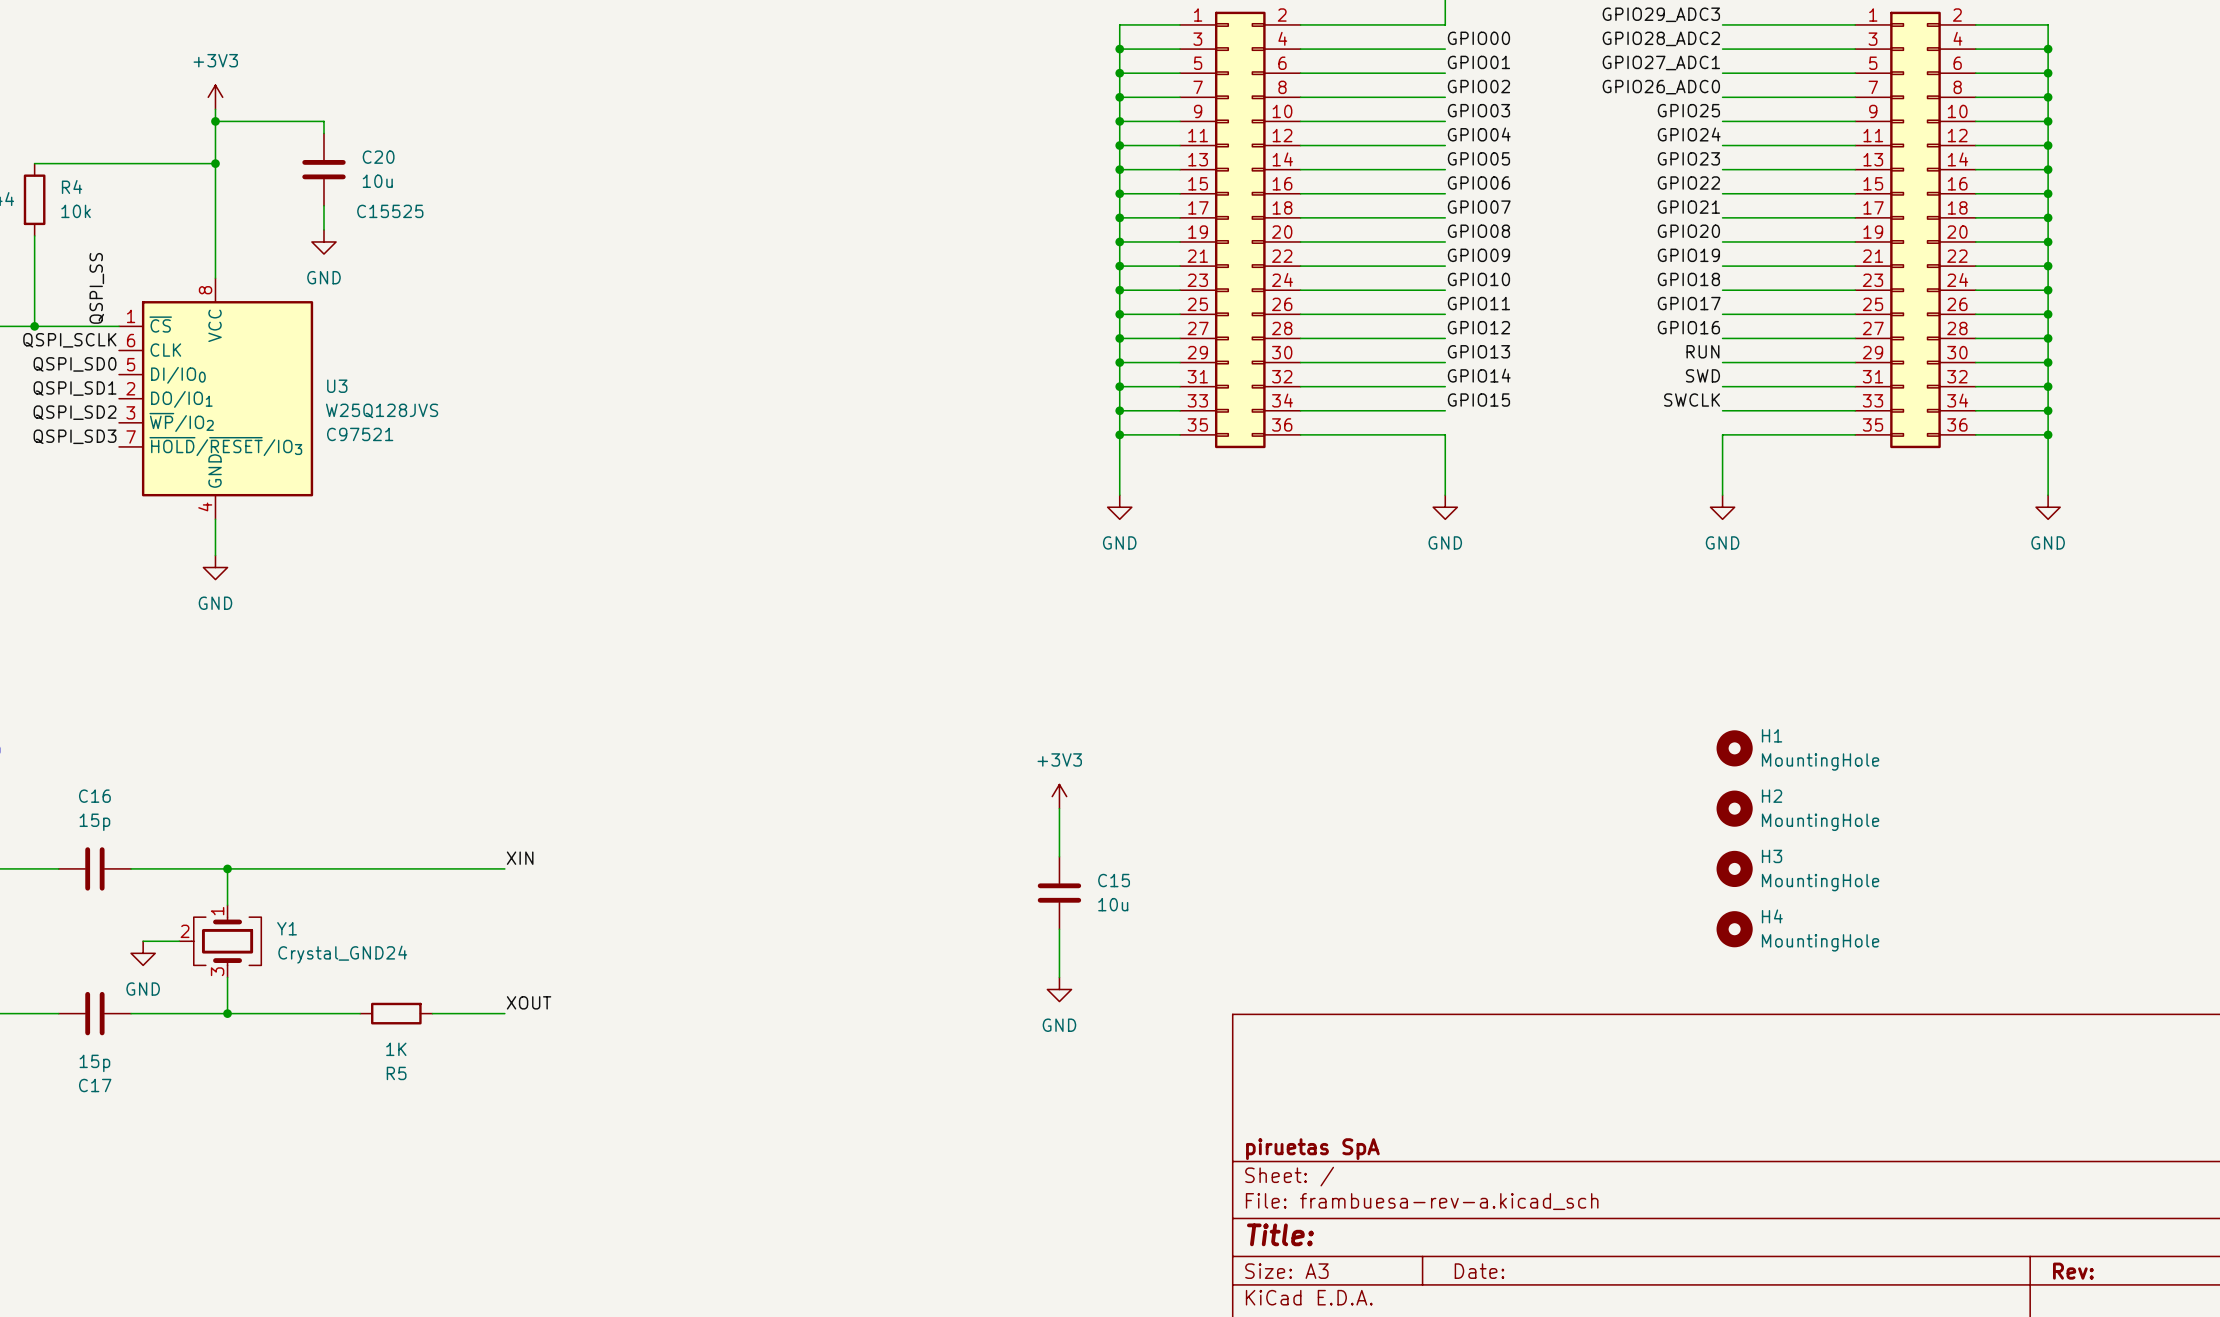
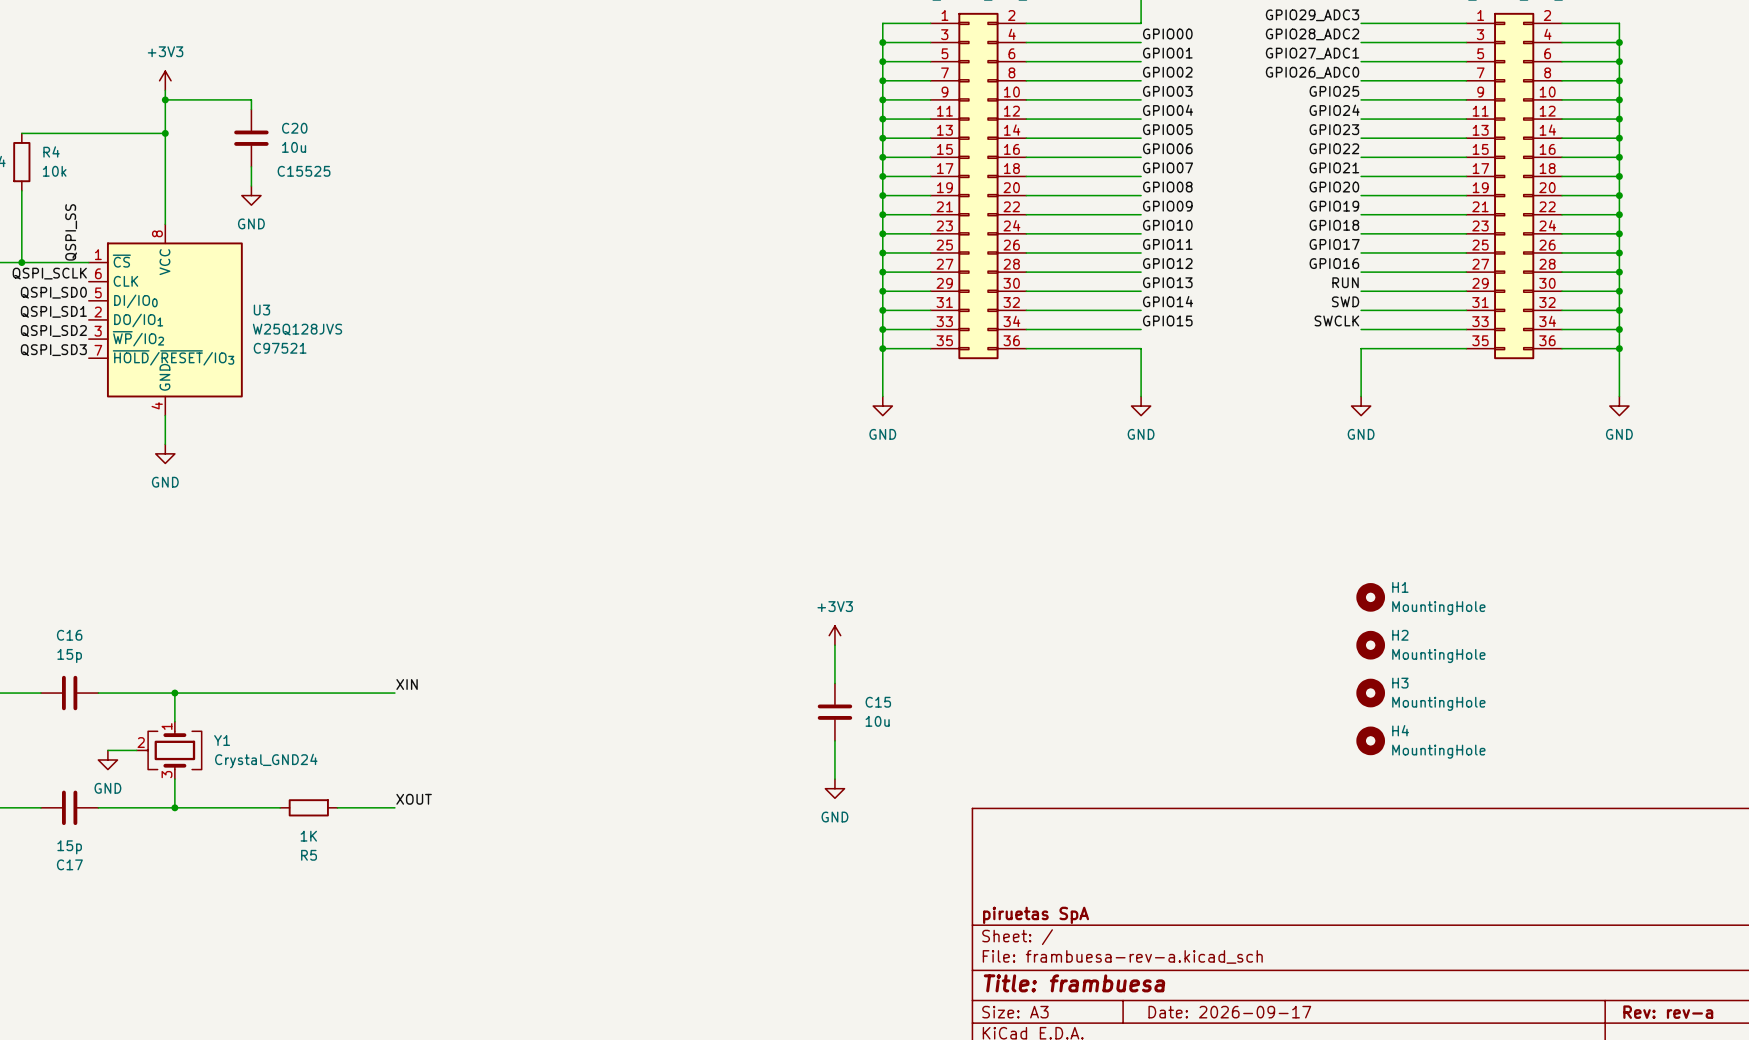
title block: Title: (1280, 1234) -> Title: frambuesa (1074, 983)
title block: Date: (1479, 1271) -> Date: 2026-09-17 (1229, 1012)
title block: Rev: (2073, 1271) -> Rev: rev-a (1668, 1012)

